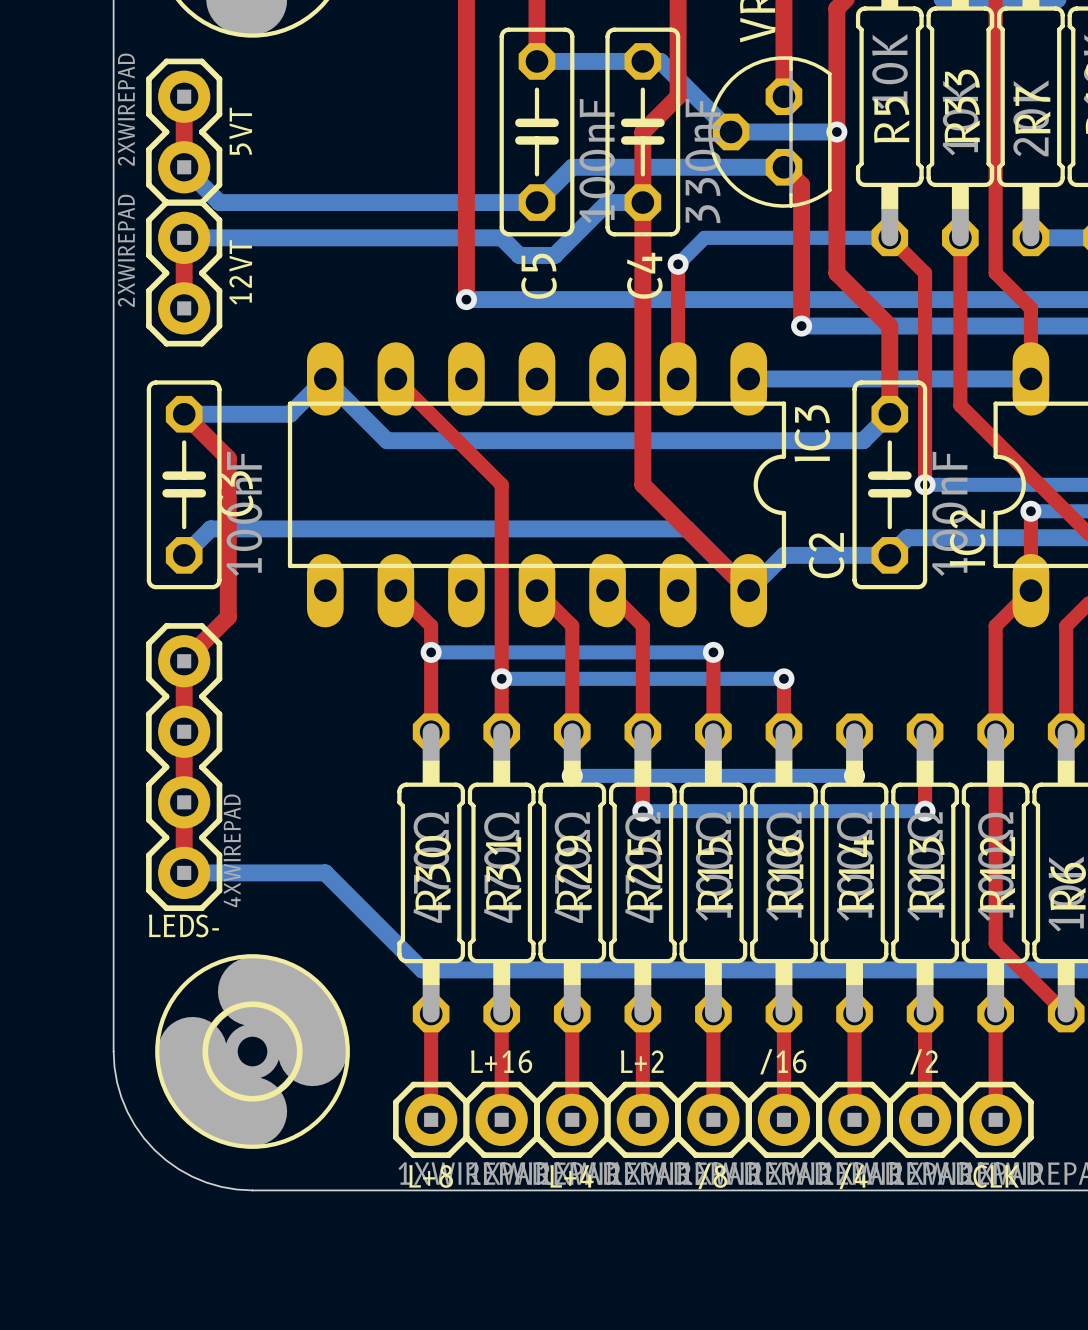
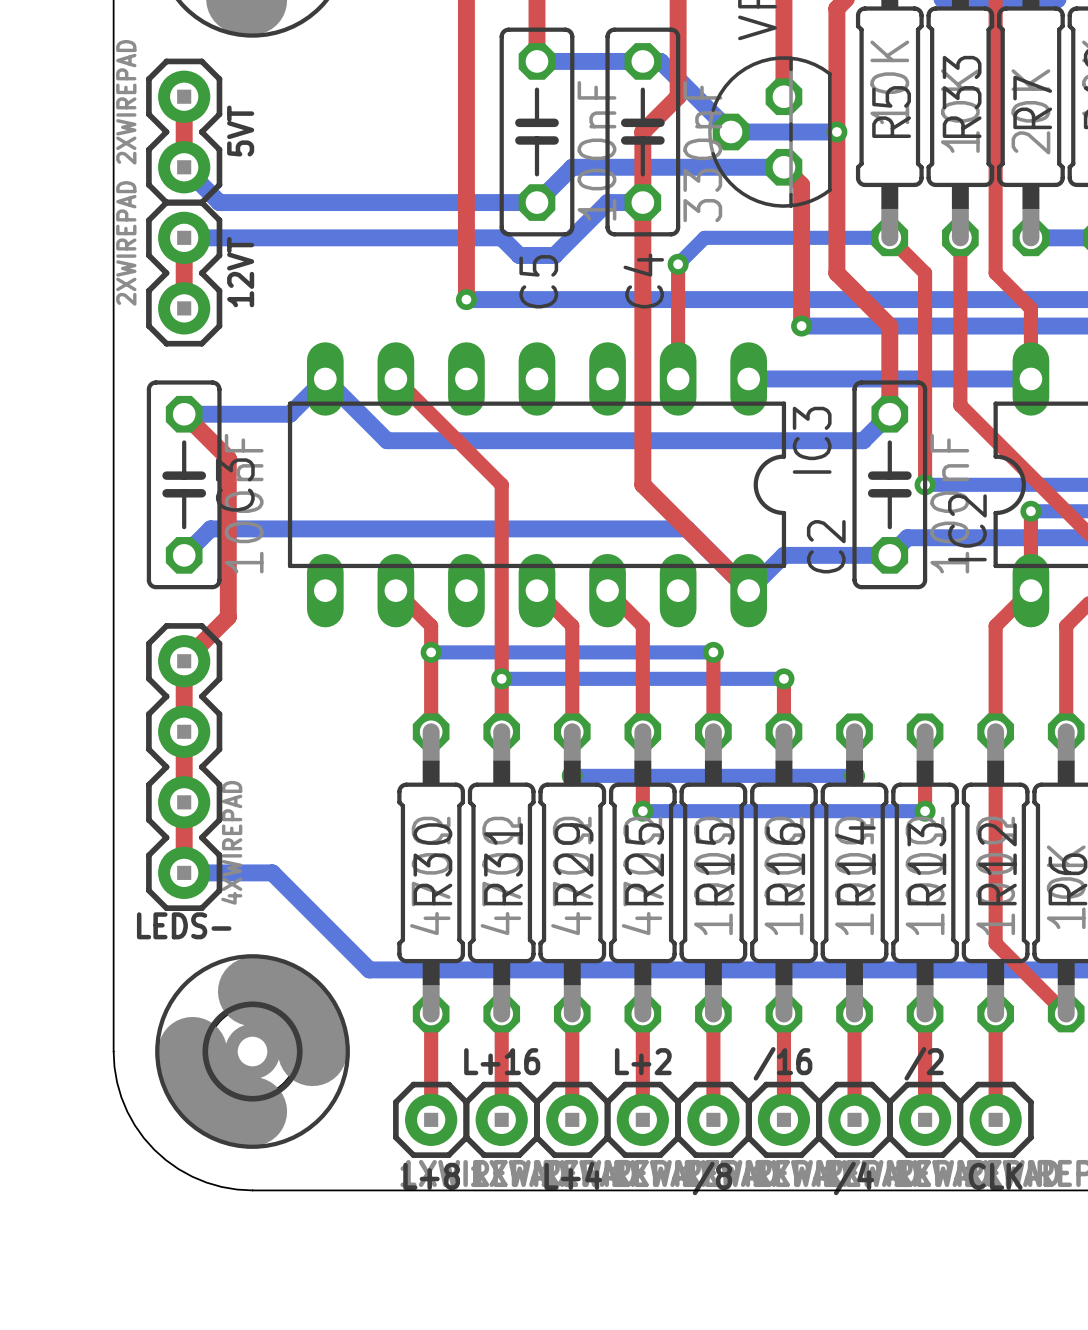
bottom track: (272, 872) (325, 872) (422, 969) -> (272, 872) (369, 969) (422, 969)

